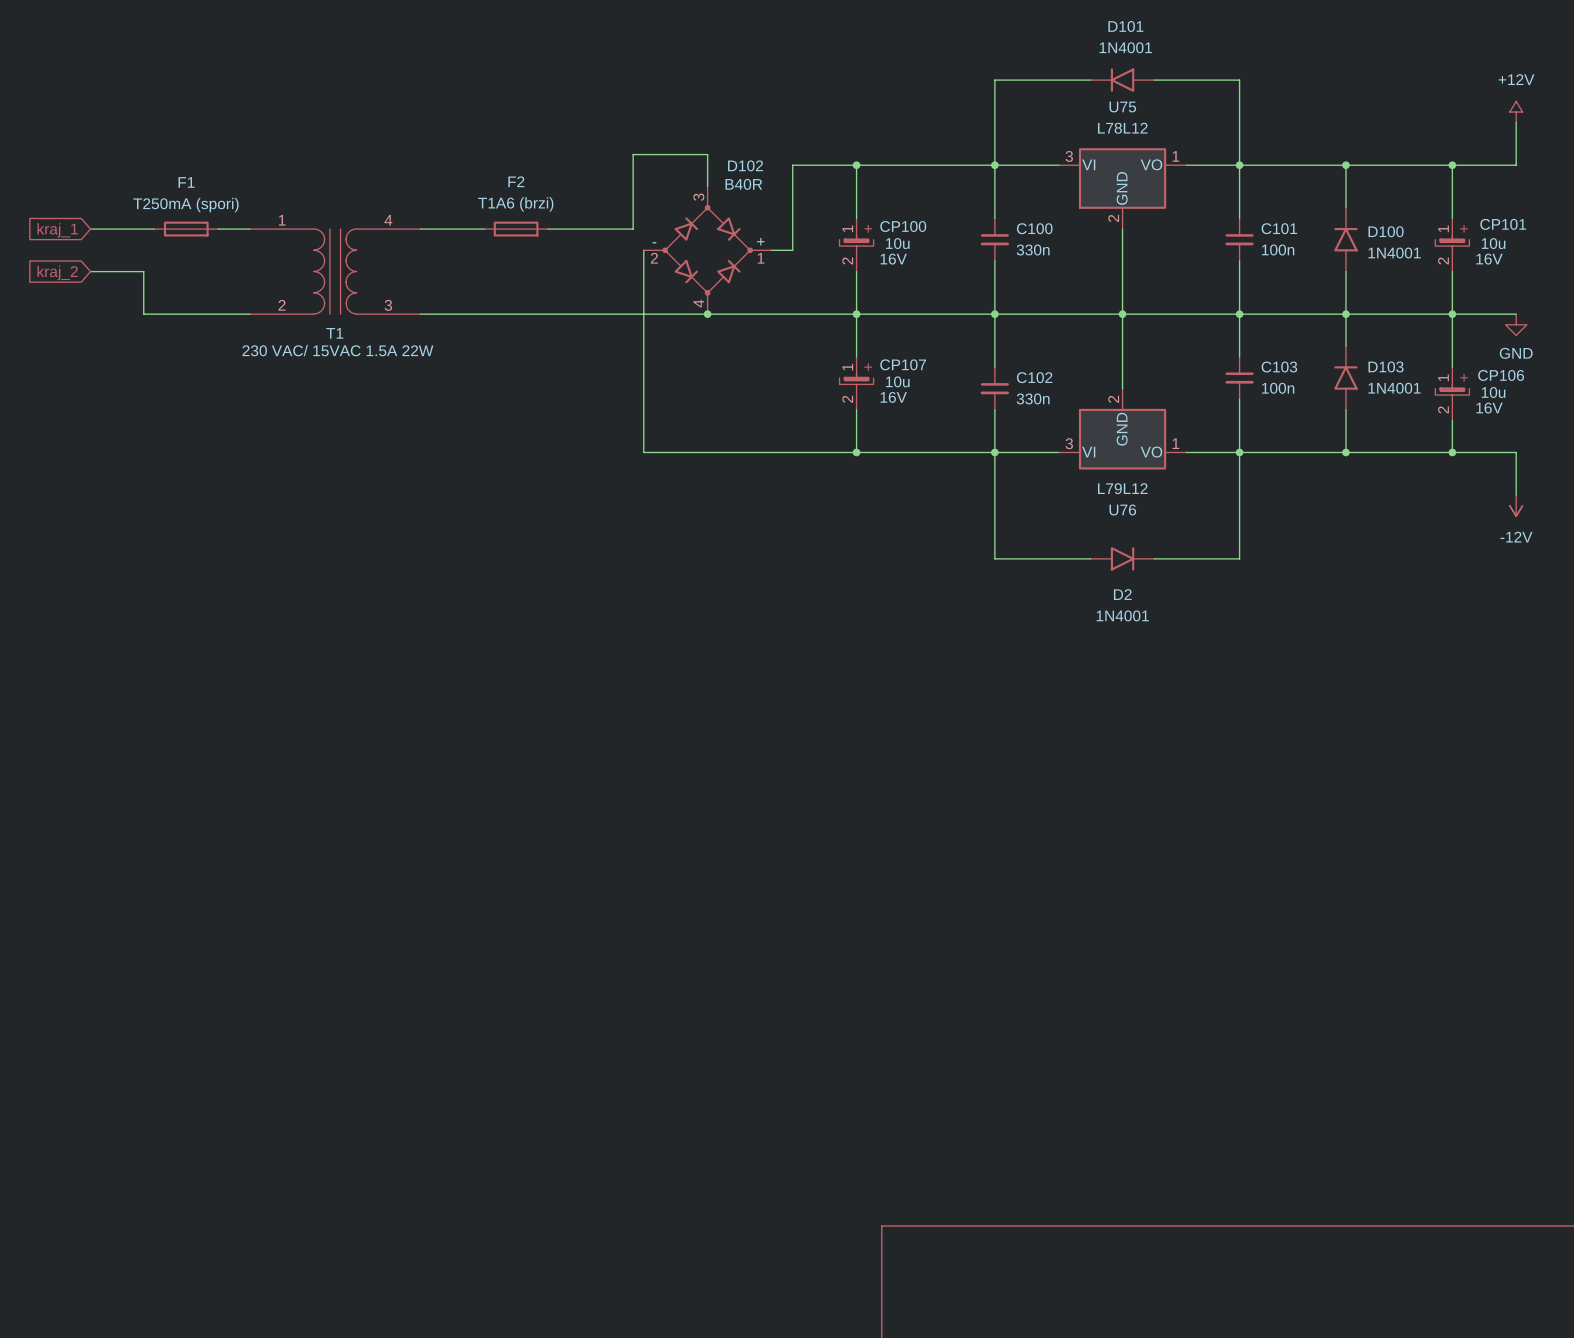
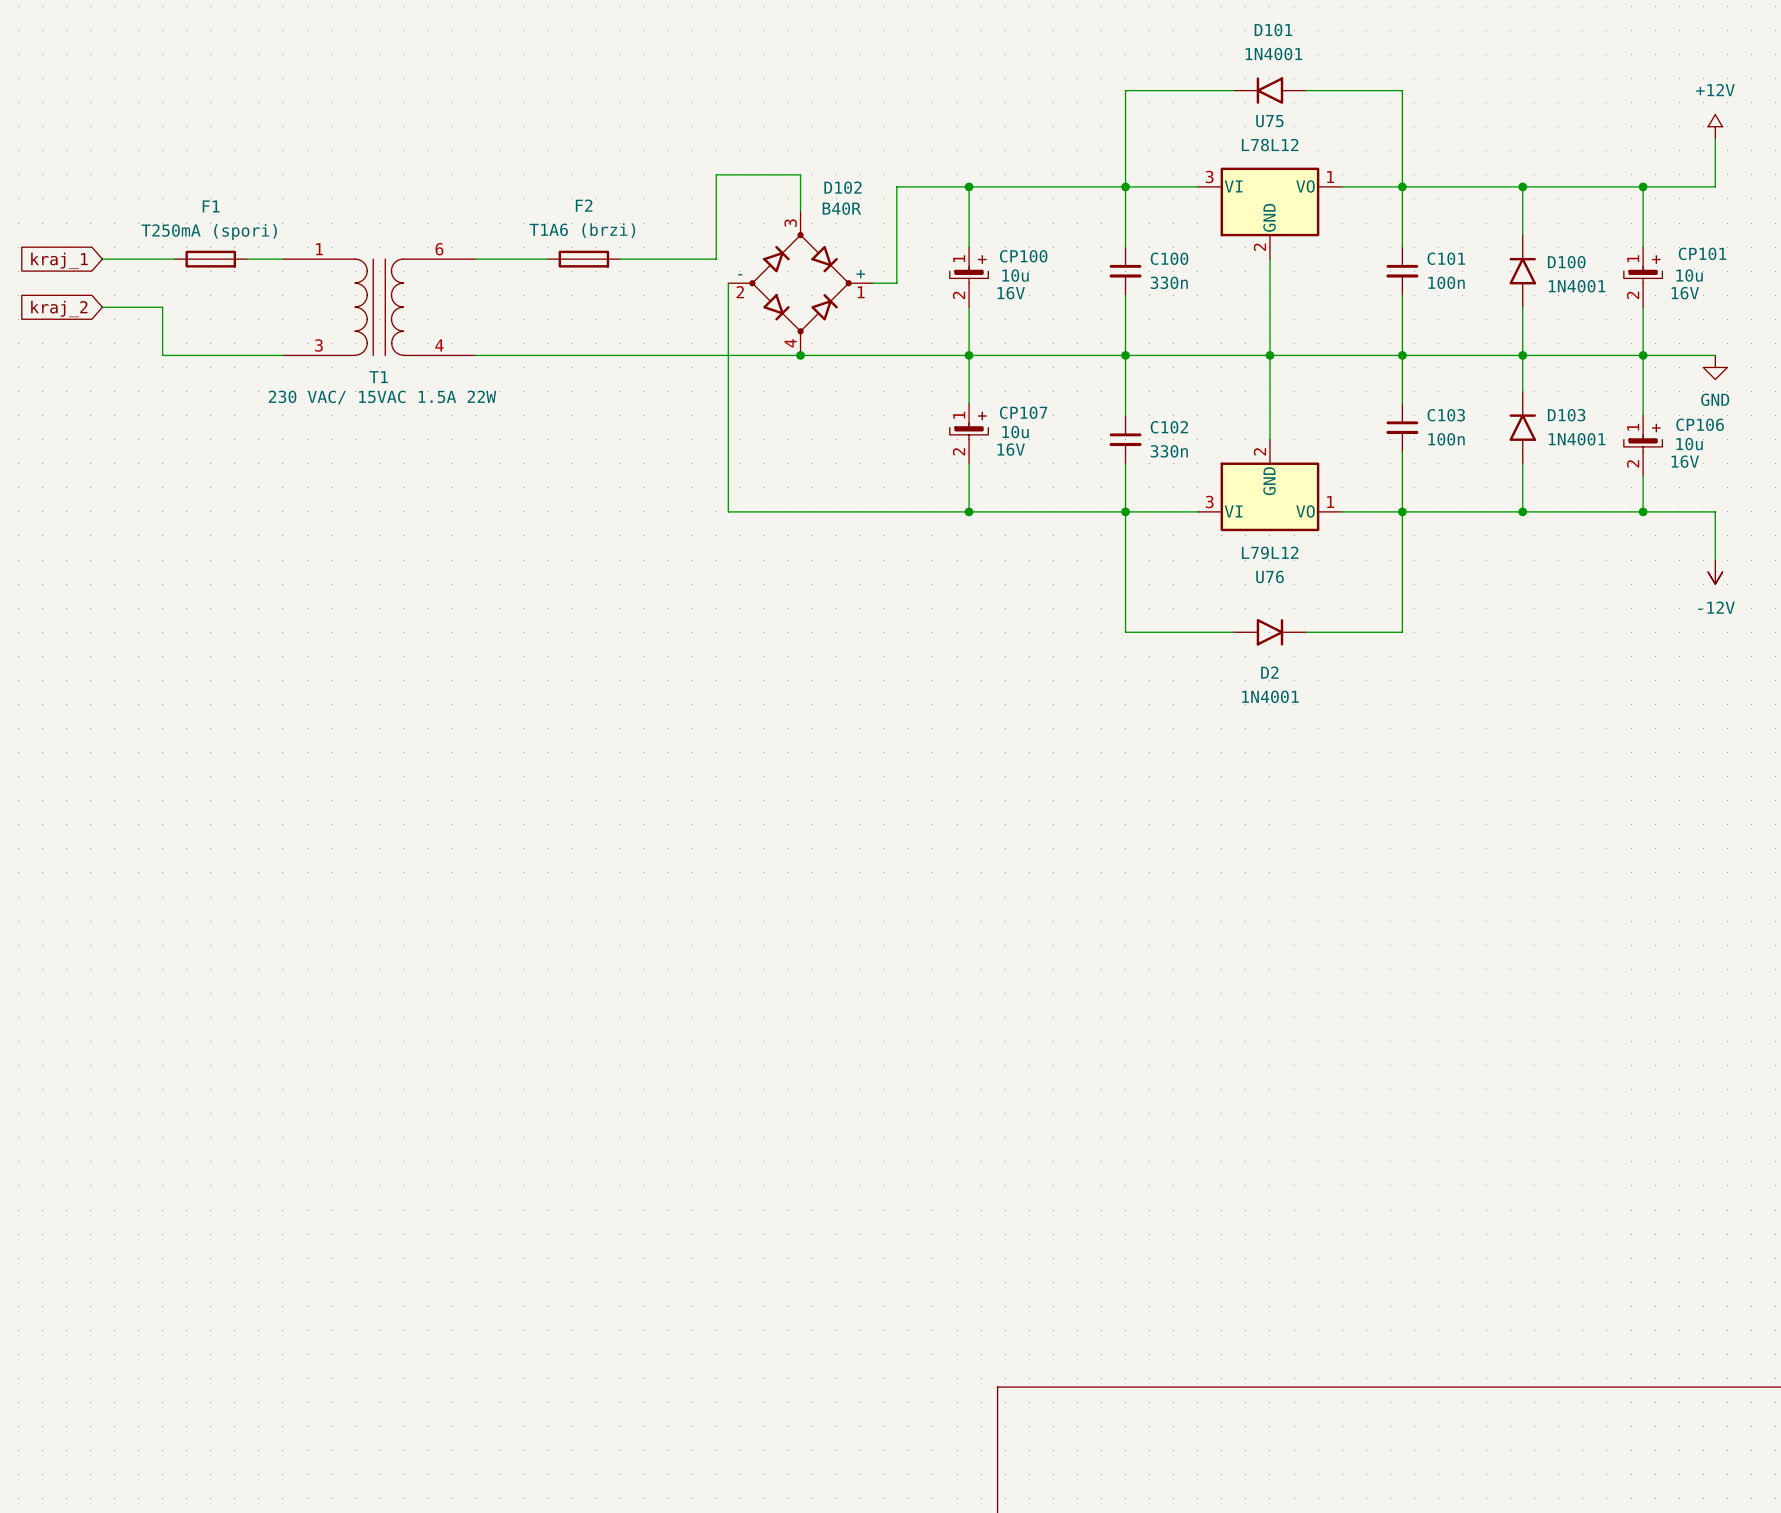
T1 pin number: 4 (388, 220) -> 6 (439, 249)
T1 pin number: 2 (282, 305) -> 3 (319, 345)
T1 pin number: 3 (388, 305) -> 4 (439, 345)

